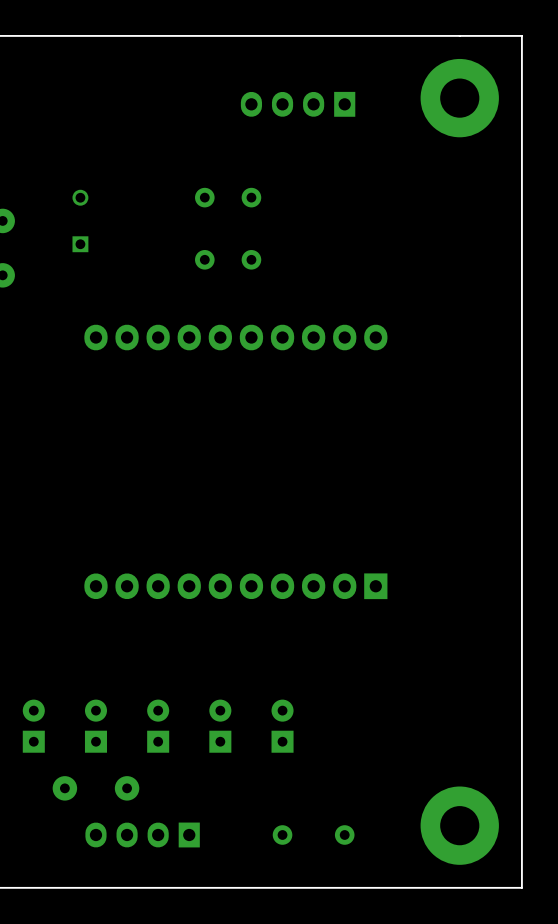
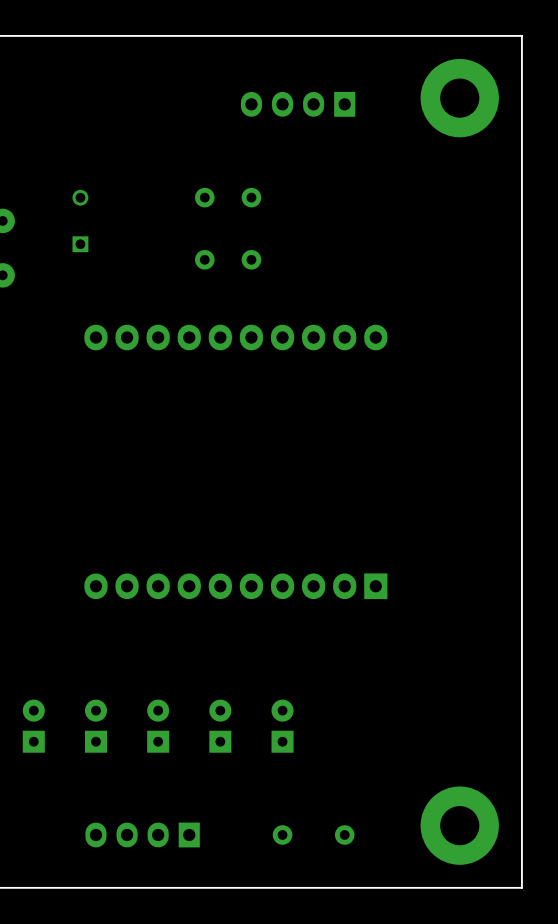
part: (64, 788) -> none
part: (127, 788) -> none

